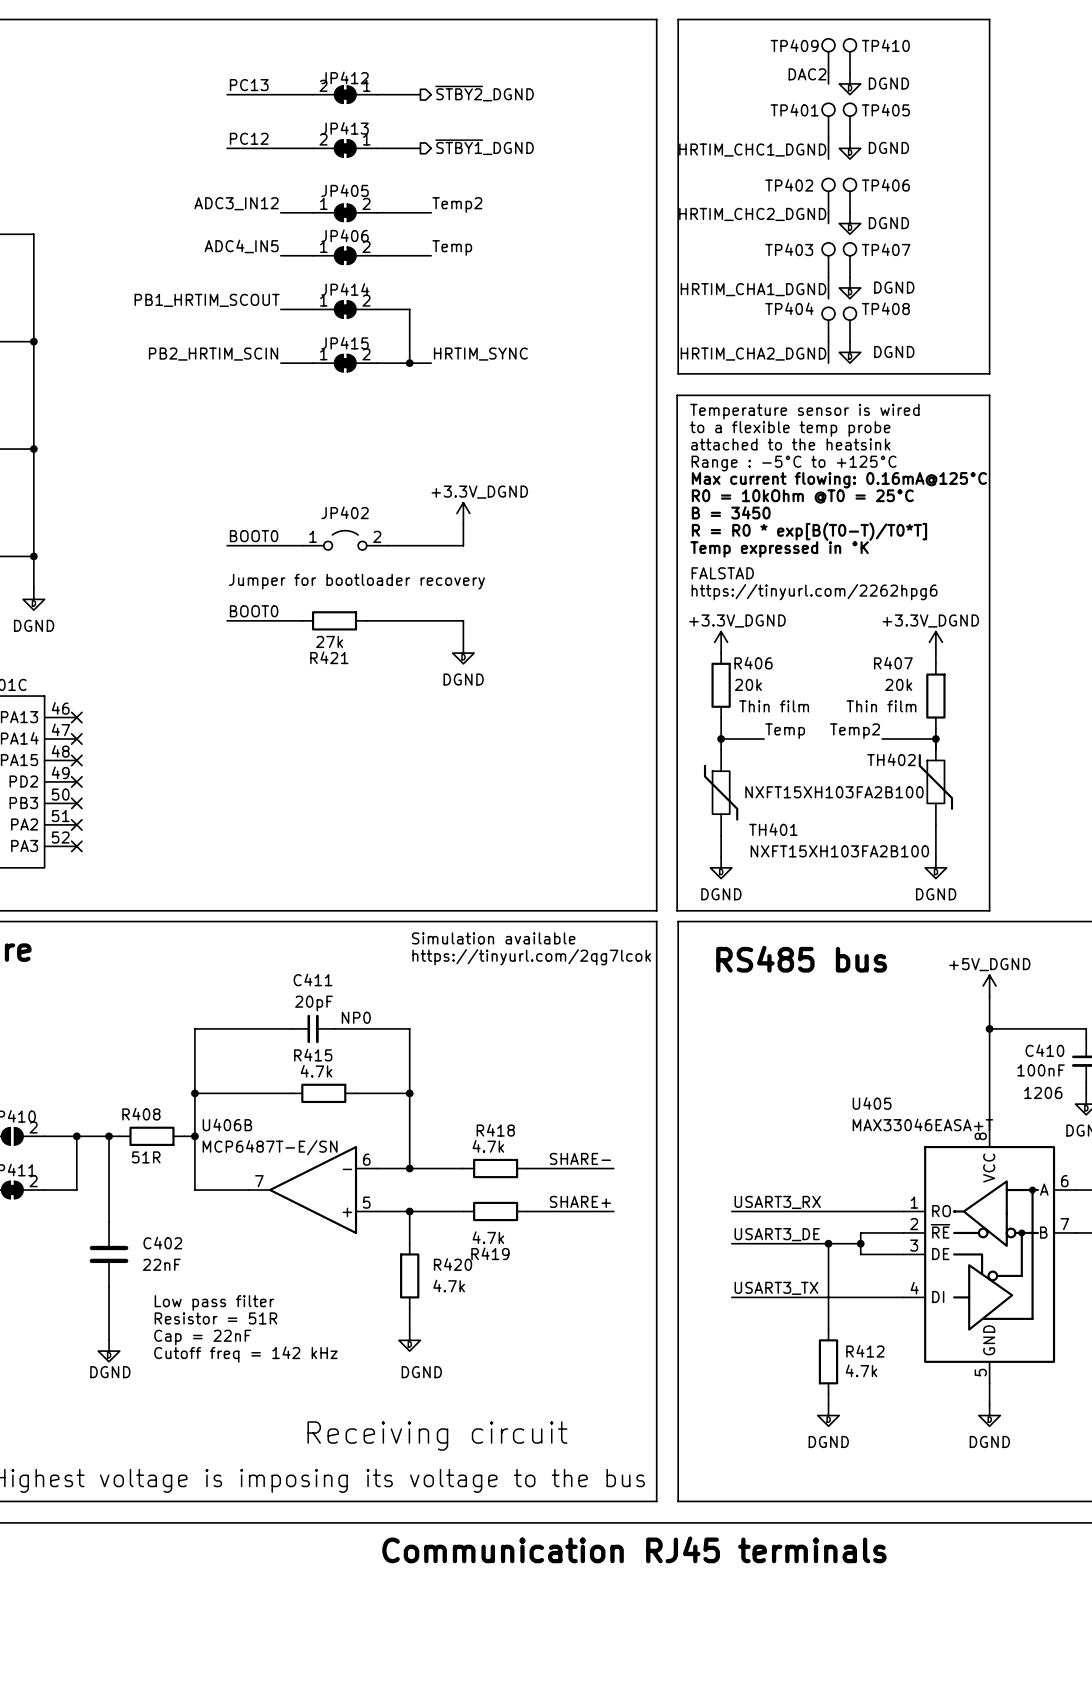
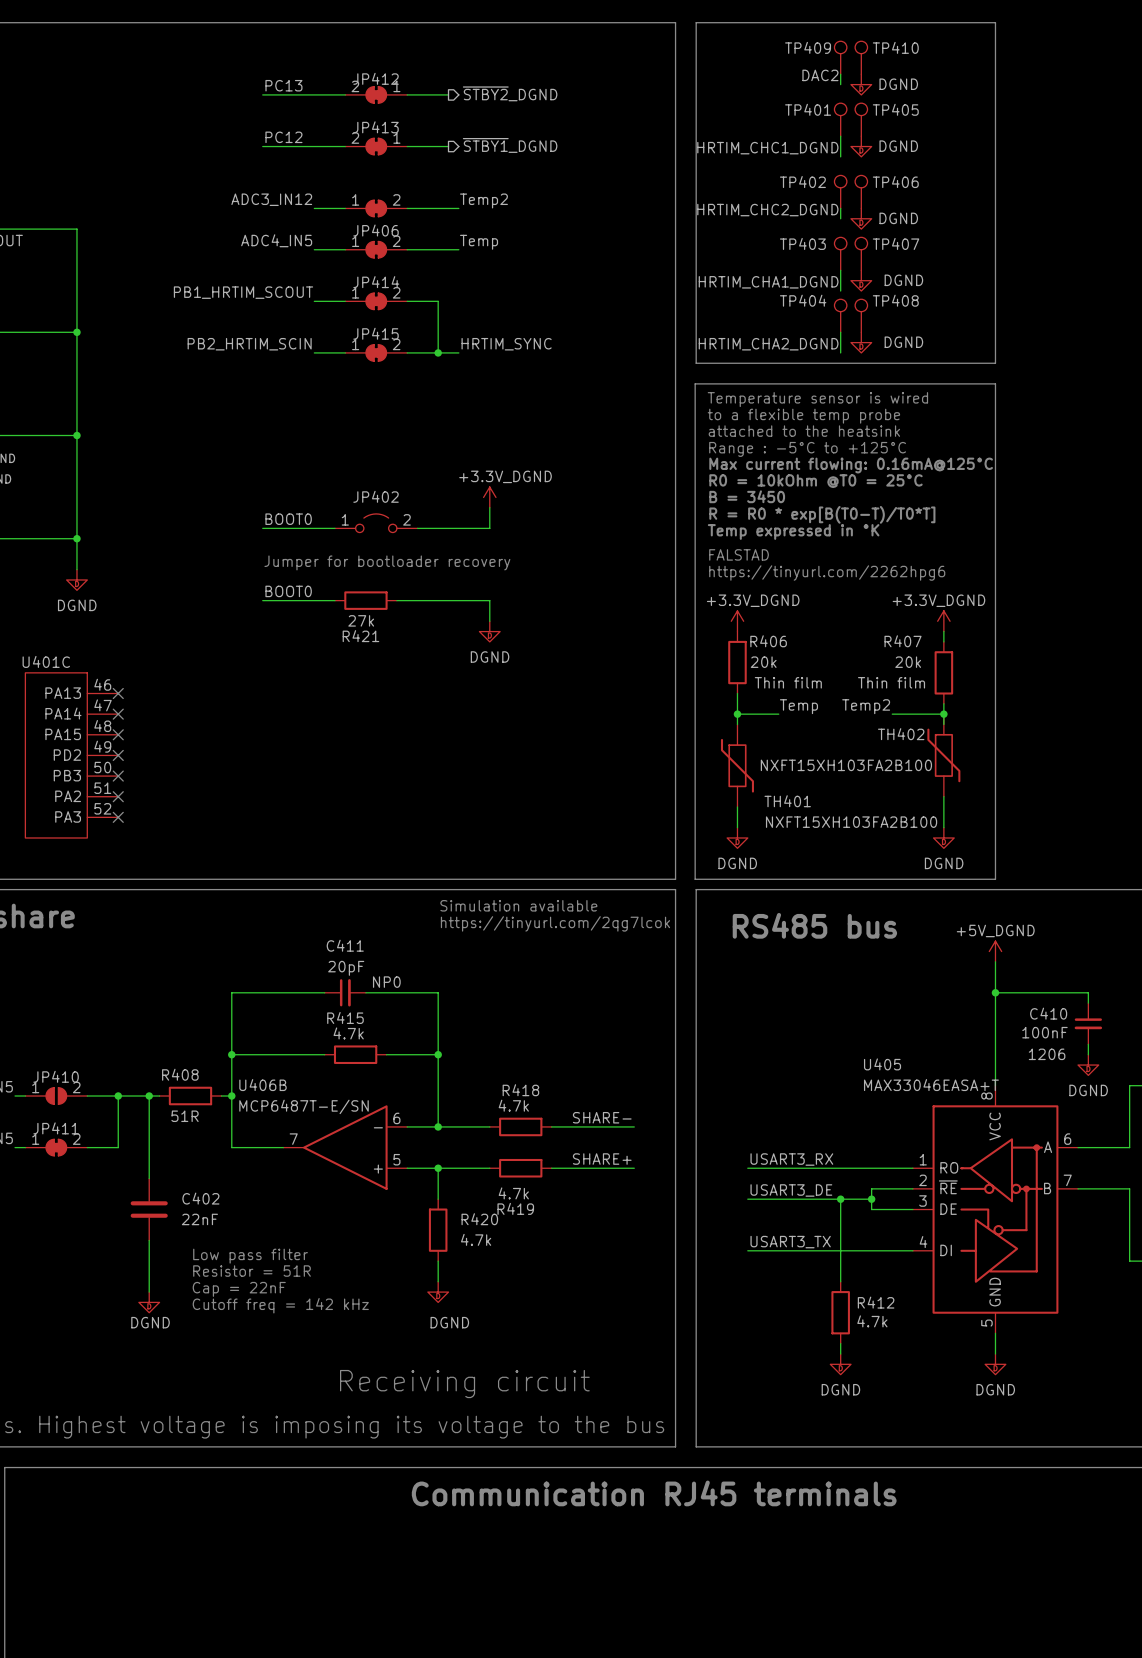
JP405 name: JP405 (345, 190) -> none

